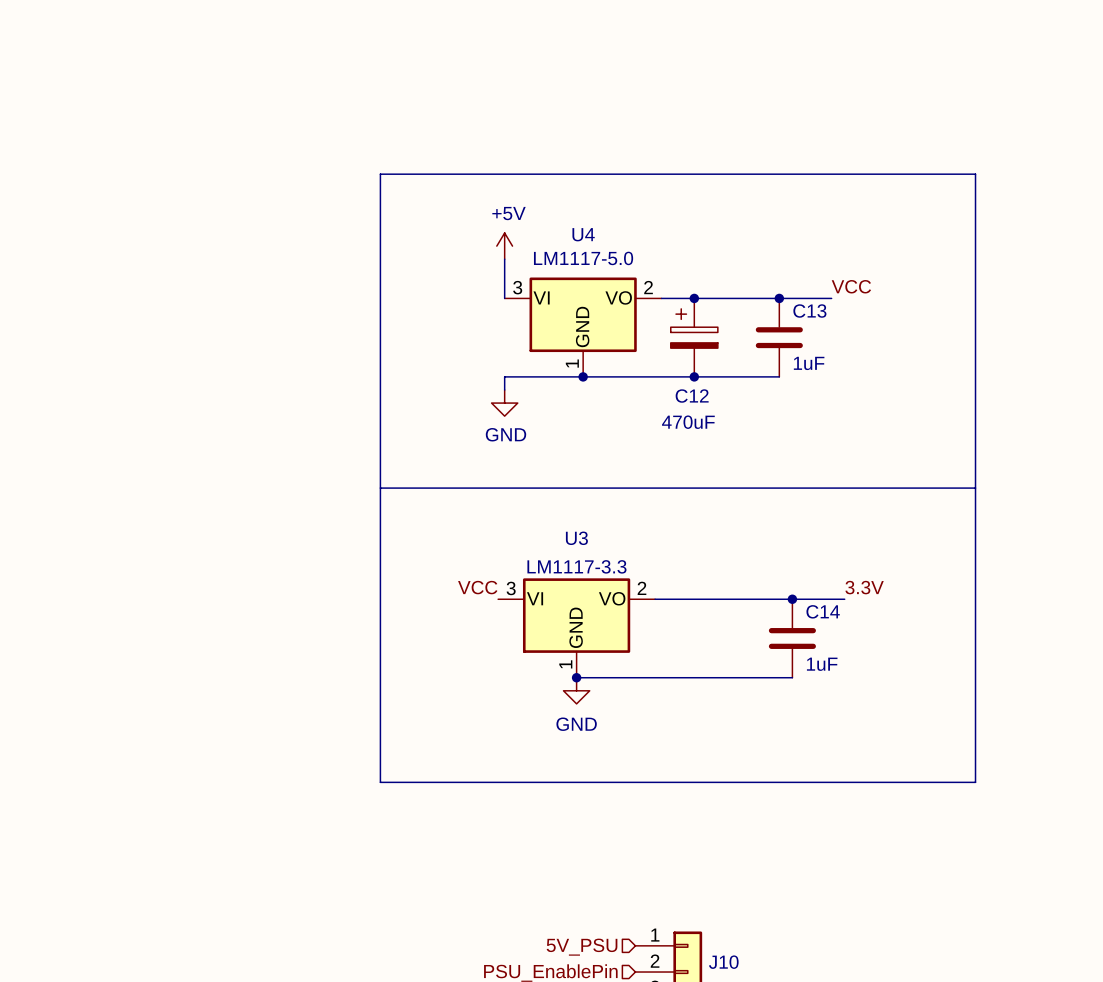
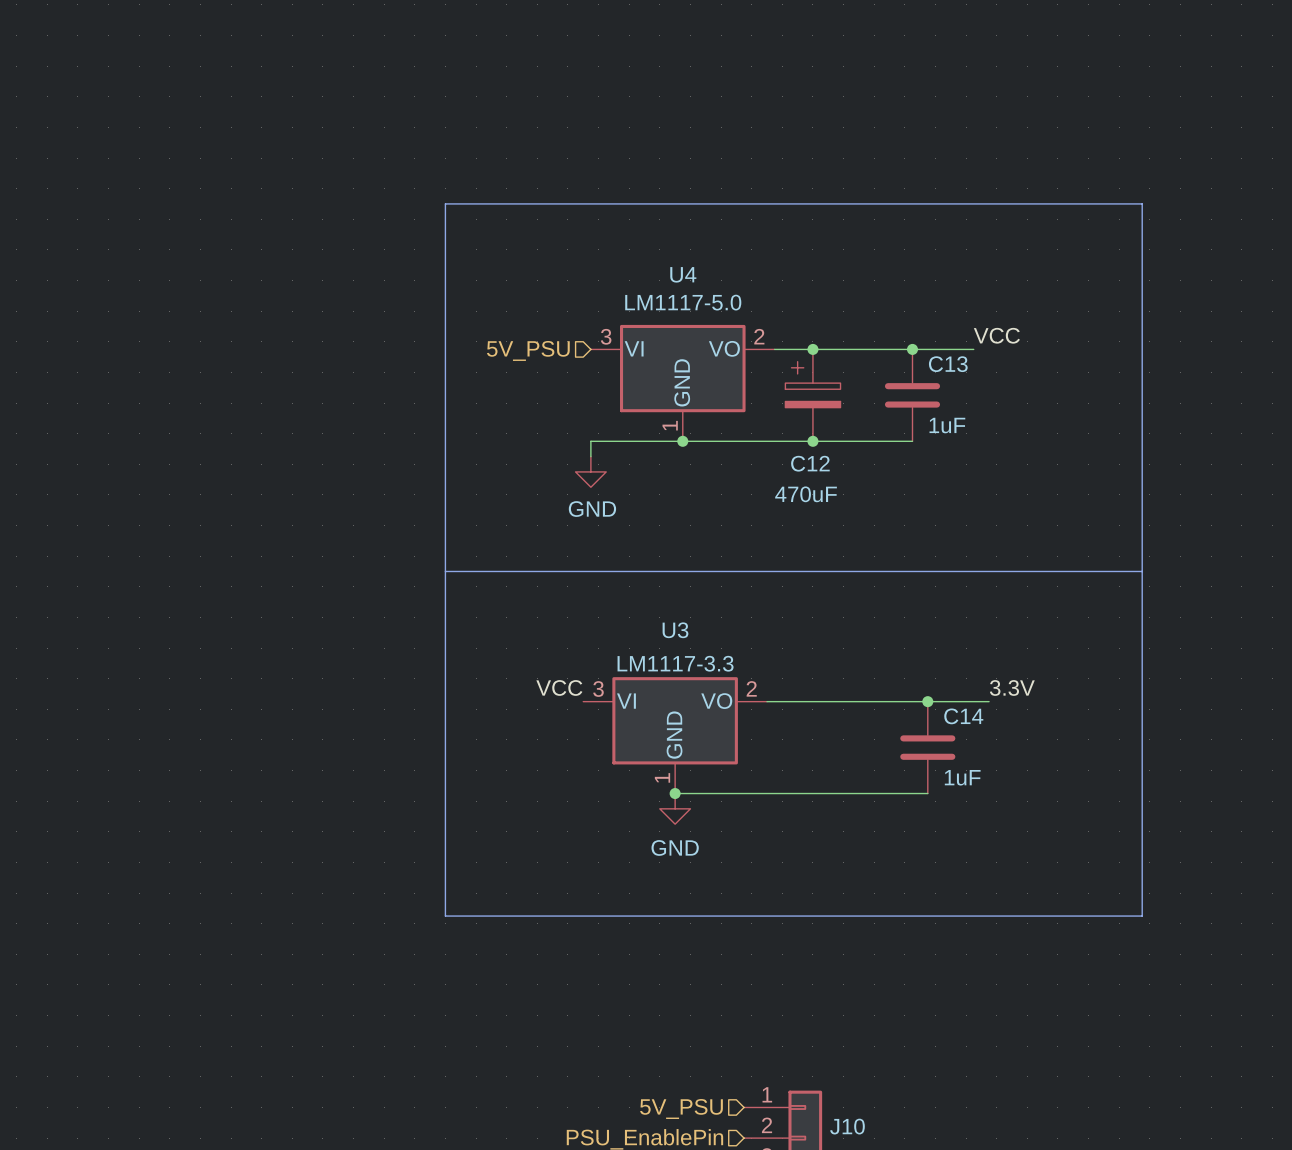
power symbol: +5V (504, 246) -> none
wire: (504, 259) (504, 298) -> none
hierarchical label: none -> 5V_PSU (528, 350)

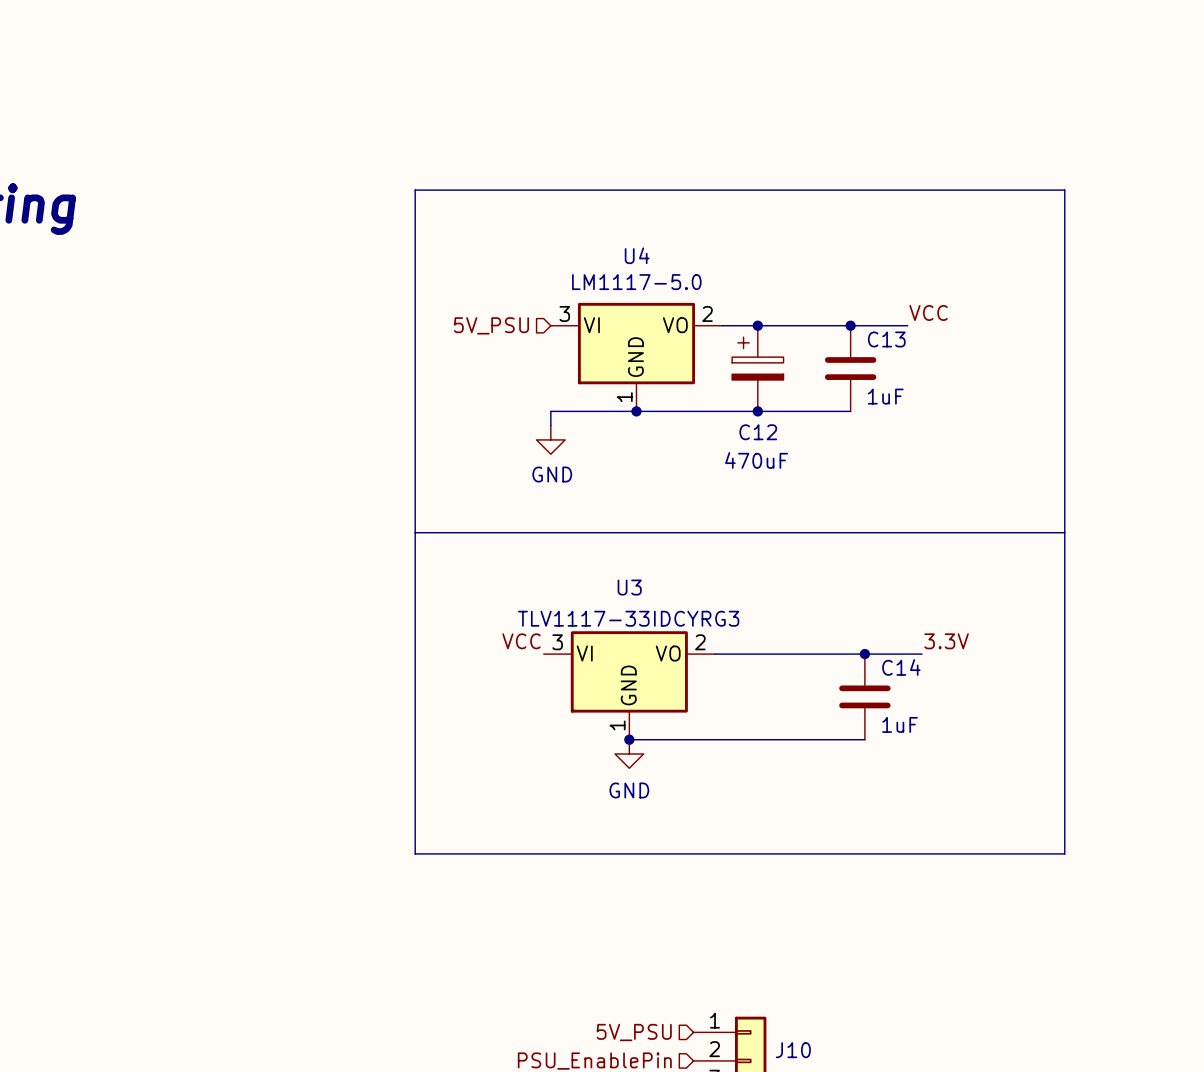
U3 value: LM1117-3.3 (675, 663) -> TLV1117-33IDCYRG3 (628, 618)

